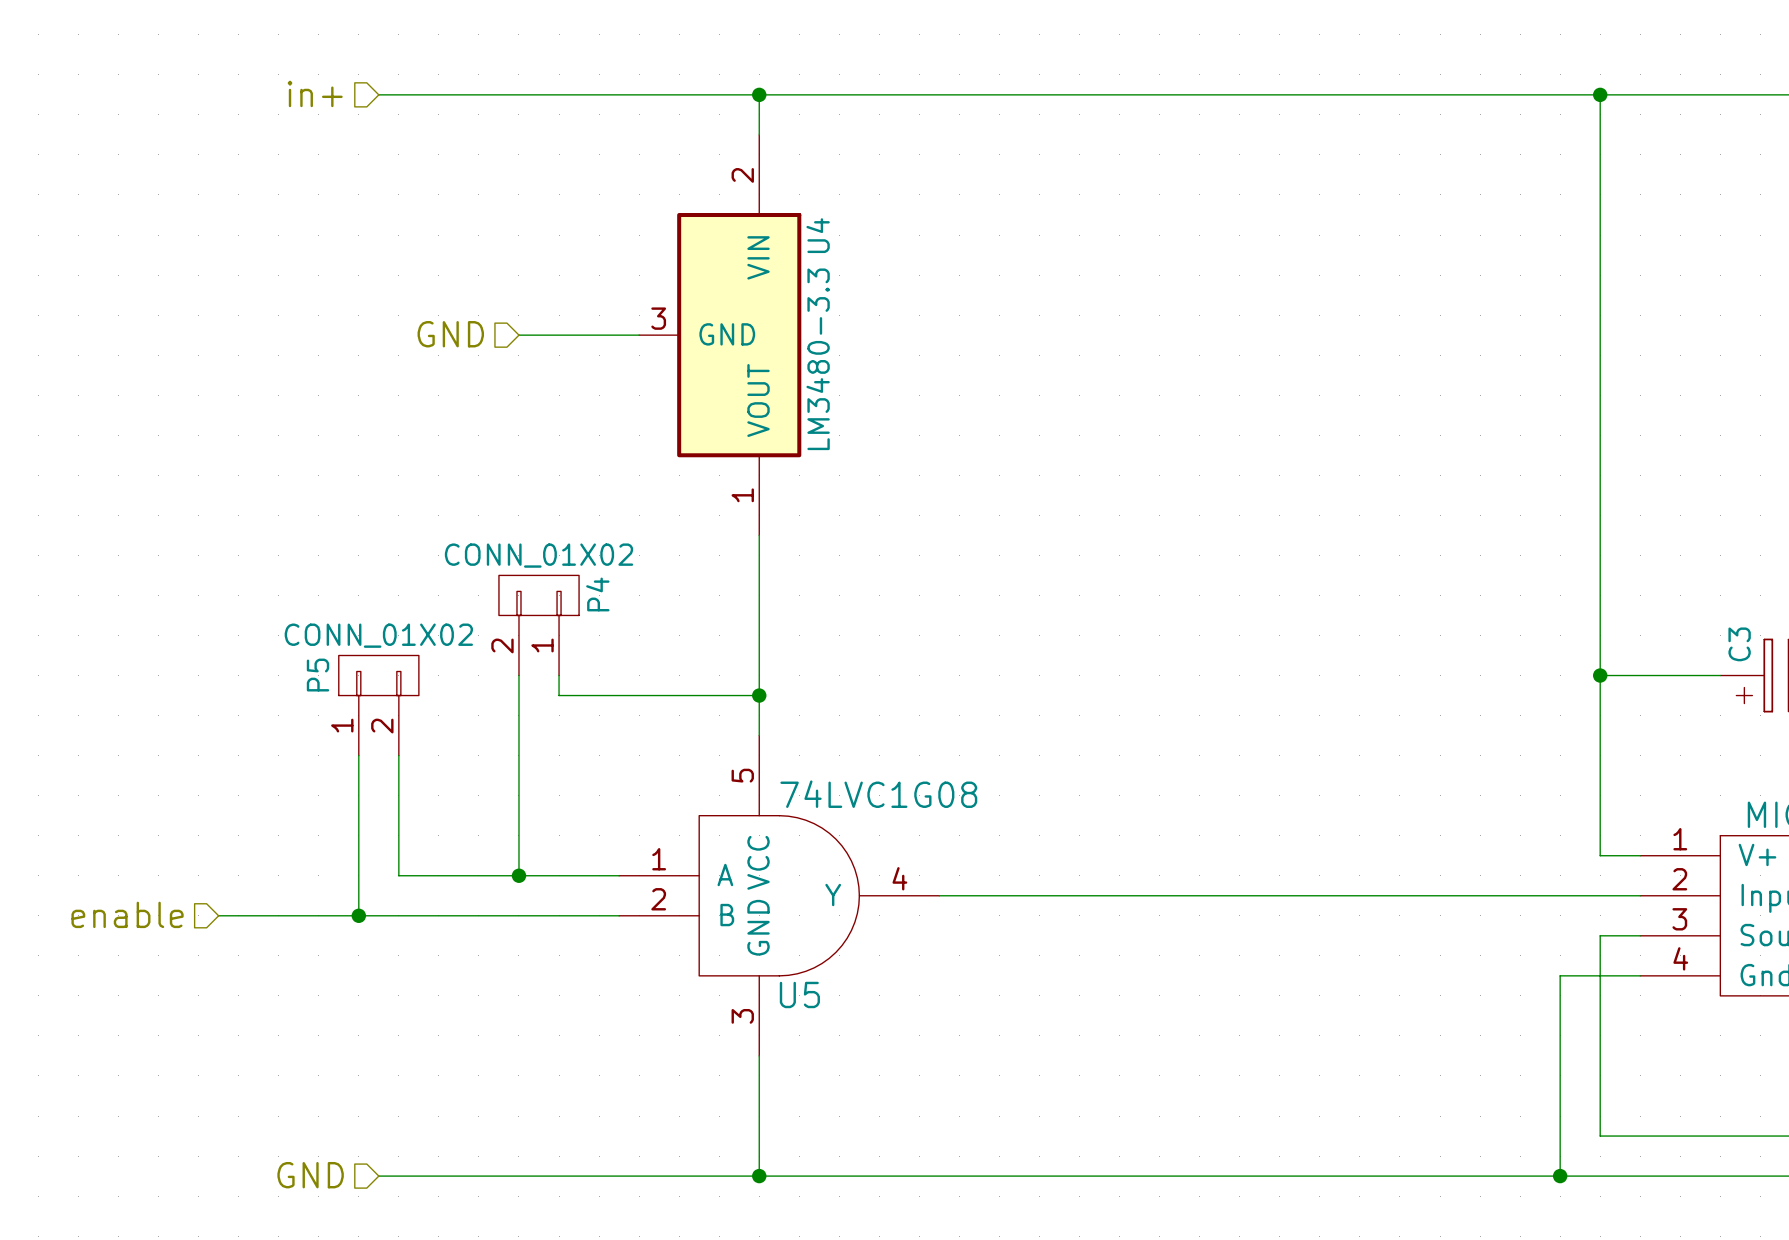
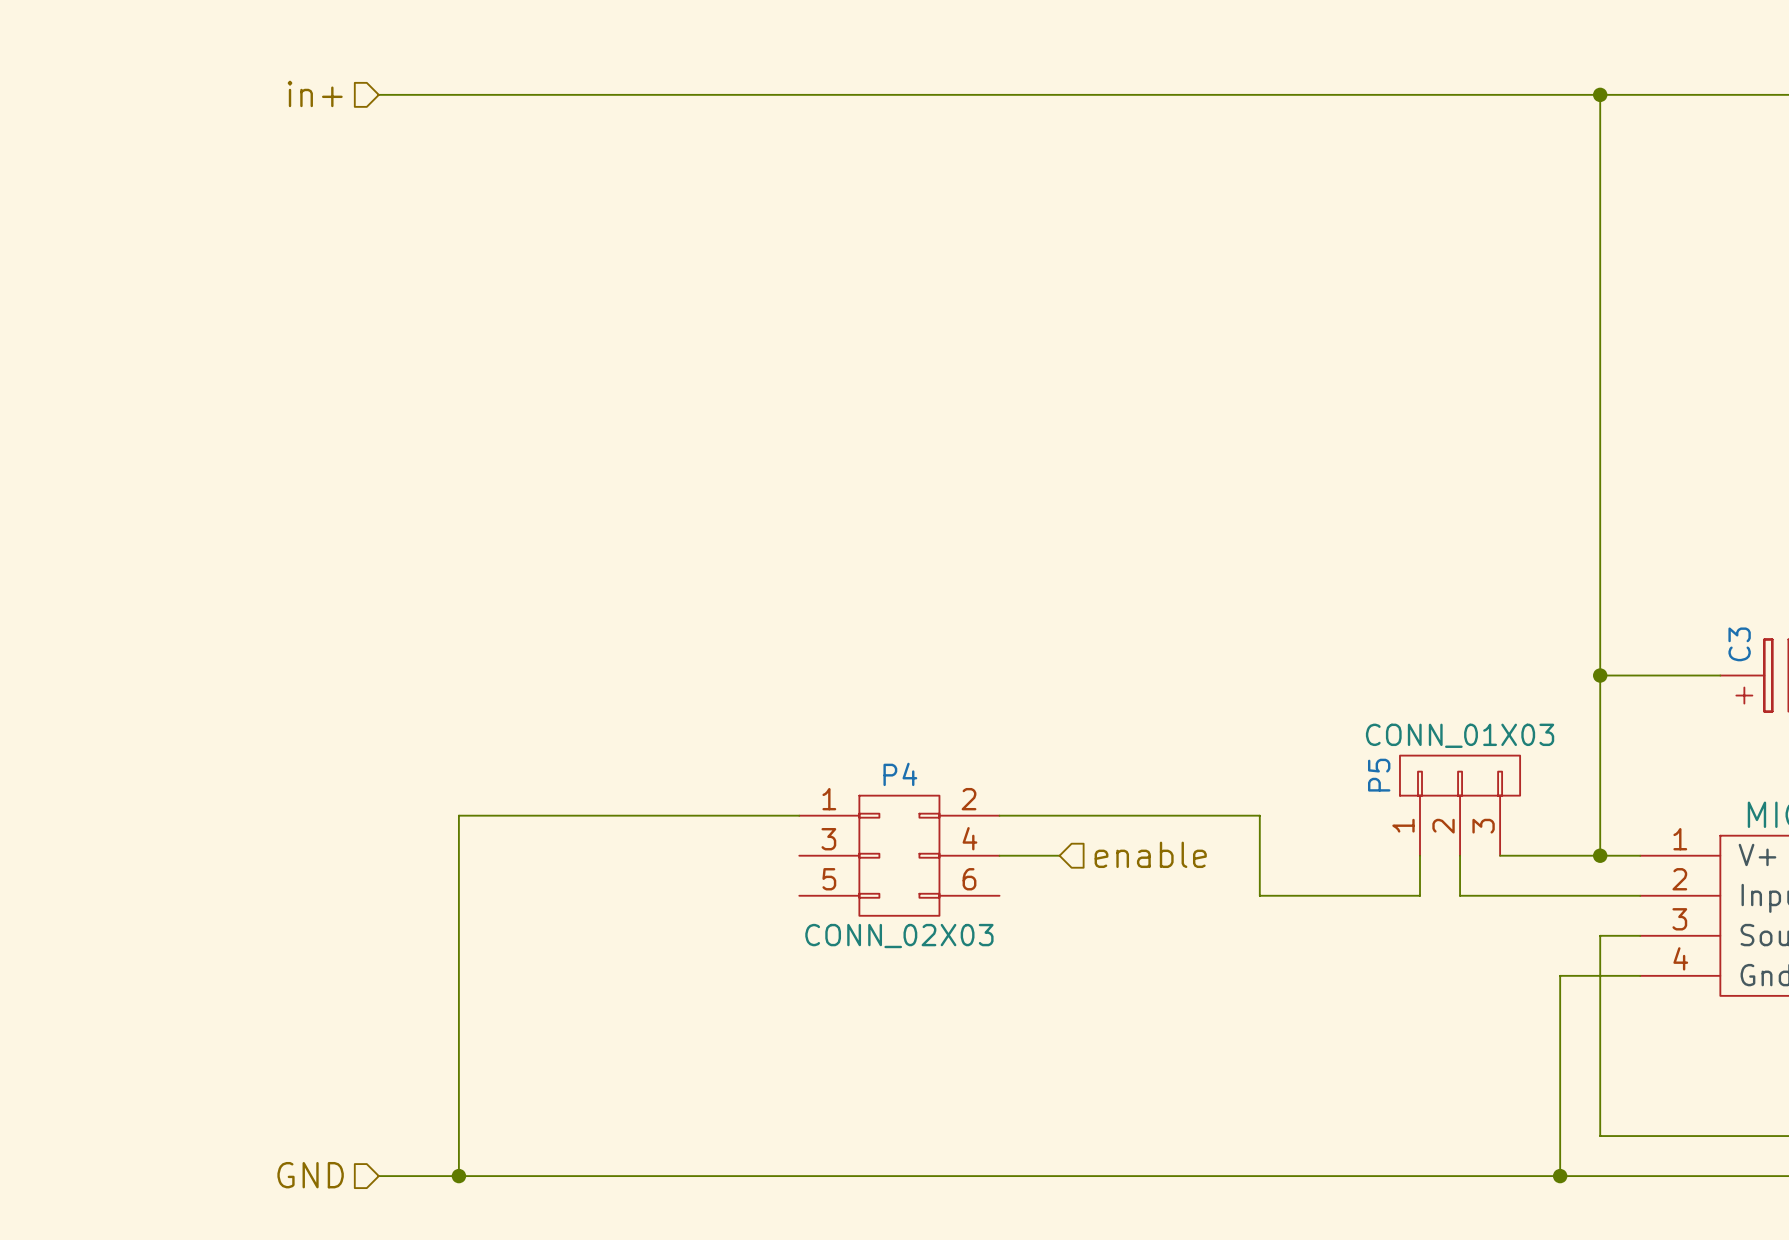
wire: (759, 94) (759, 134) -> none
junction: (759, 94) -> none
hierarchical label: GND (450, 334) -> none
wire: (518, 335) (639, 335) -> none
U4: LM3480-3.3 (720, 335) -> none
wire: (759, 535) (759, 735) -> none
P4 value: CONN_01X02 (539, 555) -> CONN_02X03 (899, 936)
P4 symbol: [498, 575, 580, 676] -> [799, 795, 1000, 916]
P4 name position: P4 (597, 594) -> P4 (900, 774)
P5 value: CONN_01X02 (378, 635) -> CONN_01X03 (1460, 735)
P5 symbol: [338, 655, 419, 756] -> [1399, 755, 1521, 856]
wire: (518, 675) (518, 875) -> none
wire: (559, 675) (559, 695) (759, 695) -> none
junction: (759, 695) -> none
wire: (358, 755) (358, 915) -> none
wire: (398, 755) (398, 875) (619, 875) -> none
wire: none -> (799, 815) (458, 815) (458, 1176)
hierarchical label: none -> enable (1150, 854)
wire: none -> (999, 855) (1059, 855)
wire: none -> (1460, 855) (1460, 895)
wire: none -> (1500, 855) (1600, 855)
junction: none -> (1600, 855)
junction: (518, 875) -> none
U5: 74LVC1G08 (779, 895) -> none
wire: (939, 895) (1259, 895) -> (999, 815) (1259, 815) (1259, 895)
wire: (1420, 895) (1460, 895) -> (1420, 895) (1420, 855)
hierarchical label: enable (127, 914) -> none
wire: (218, 915) (619, 915) -> none
junction: (358, 915) -> none
wire: (759, 1055) (759, 1176) -> none
junction: none -> (458, 1176)
junction: (759, 1176) -> none

